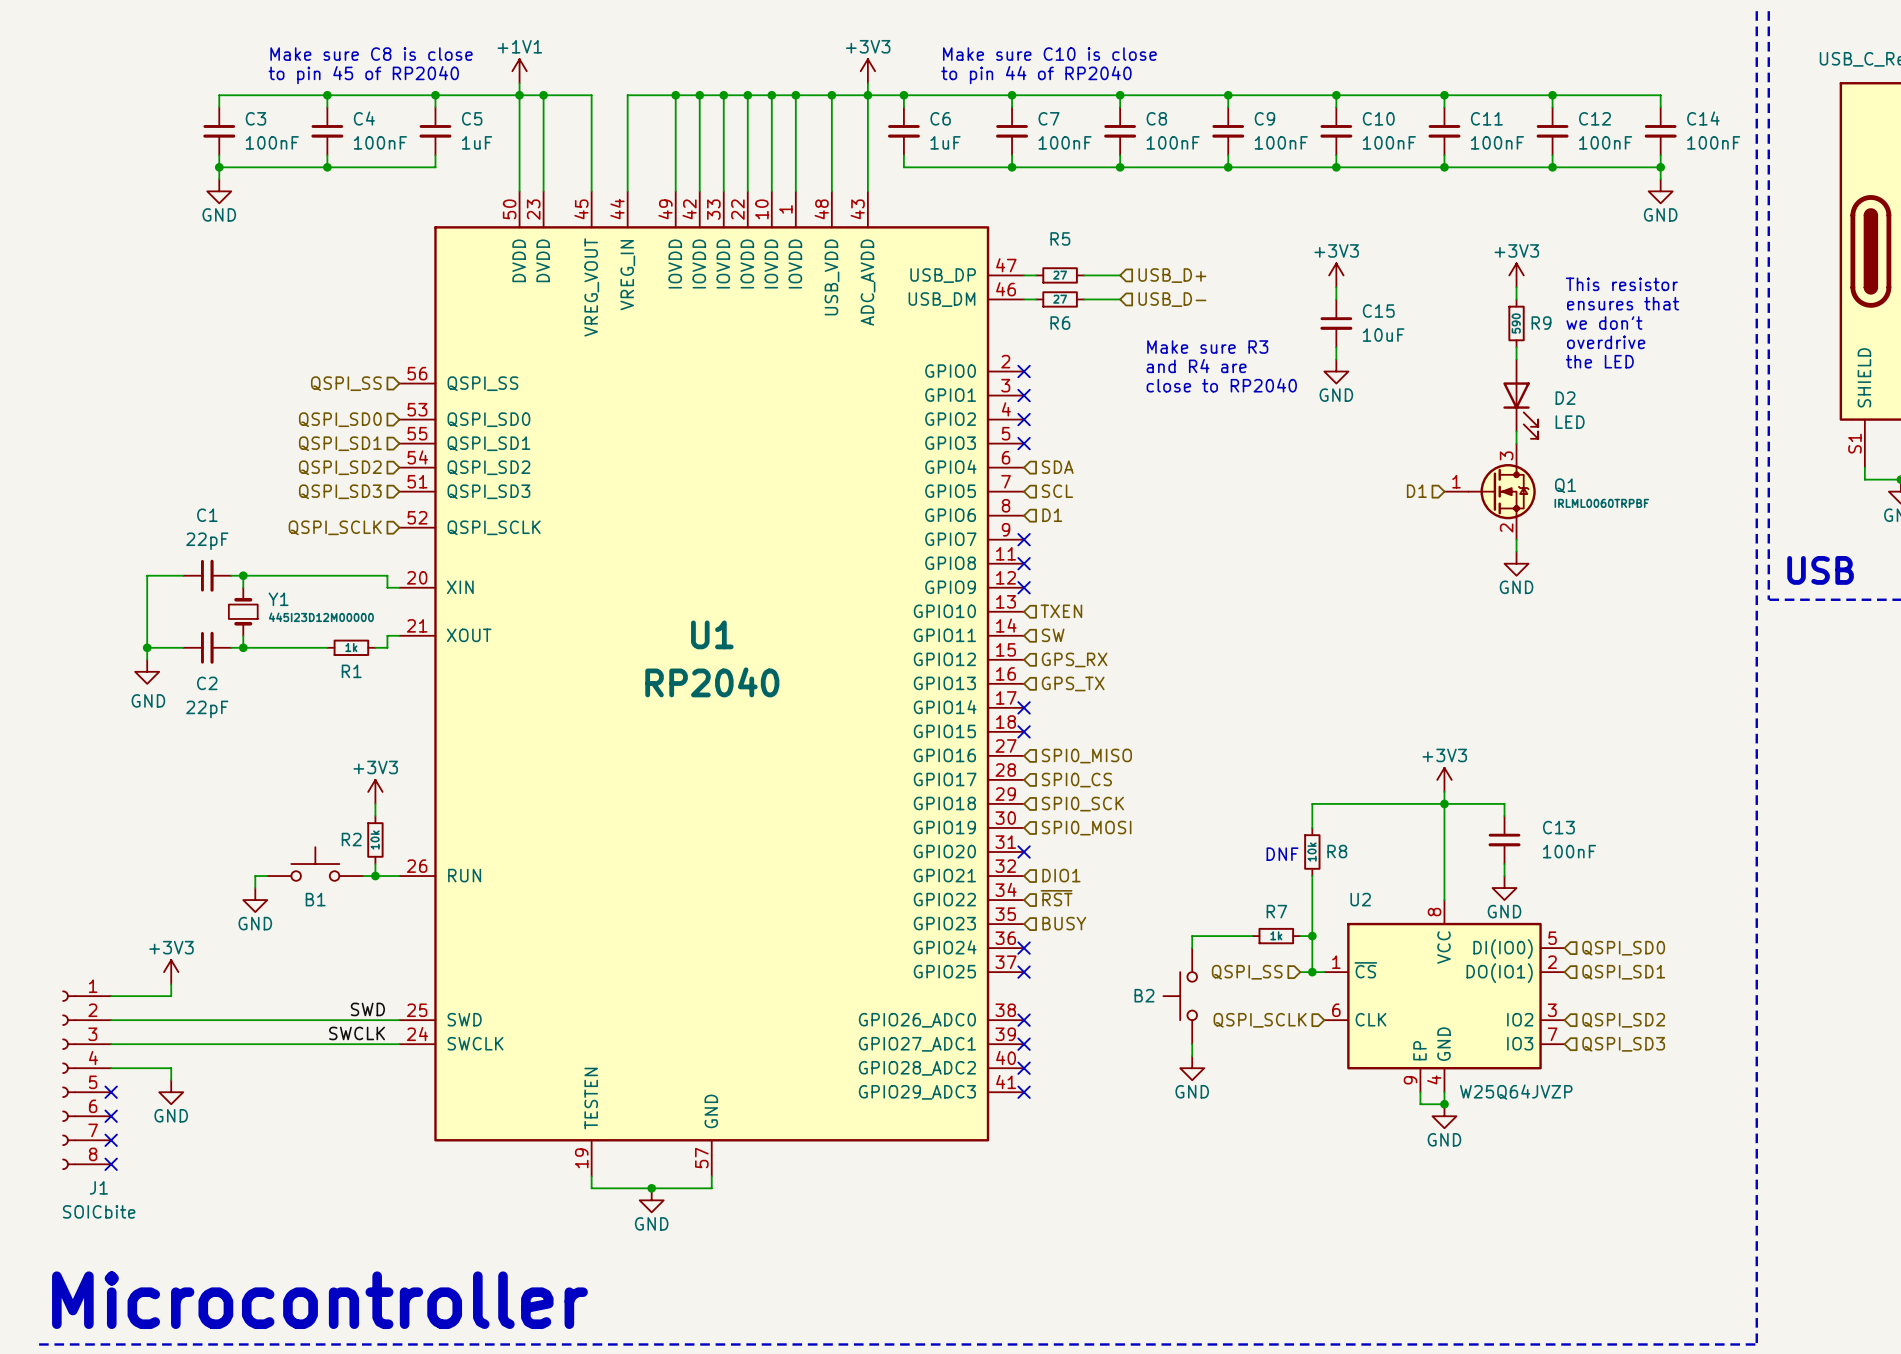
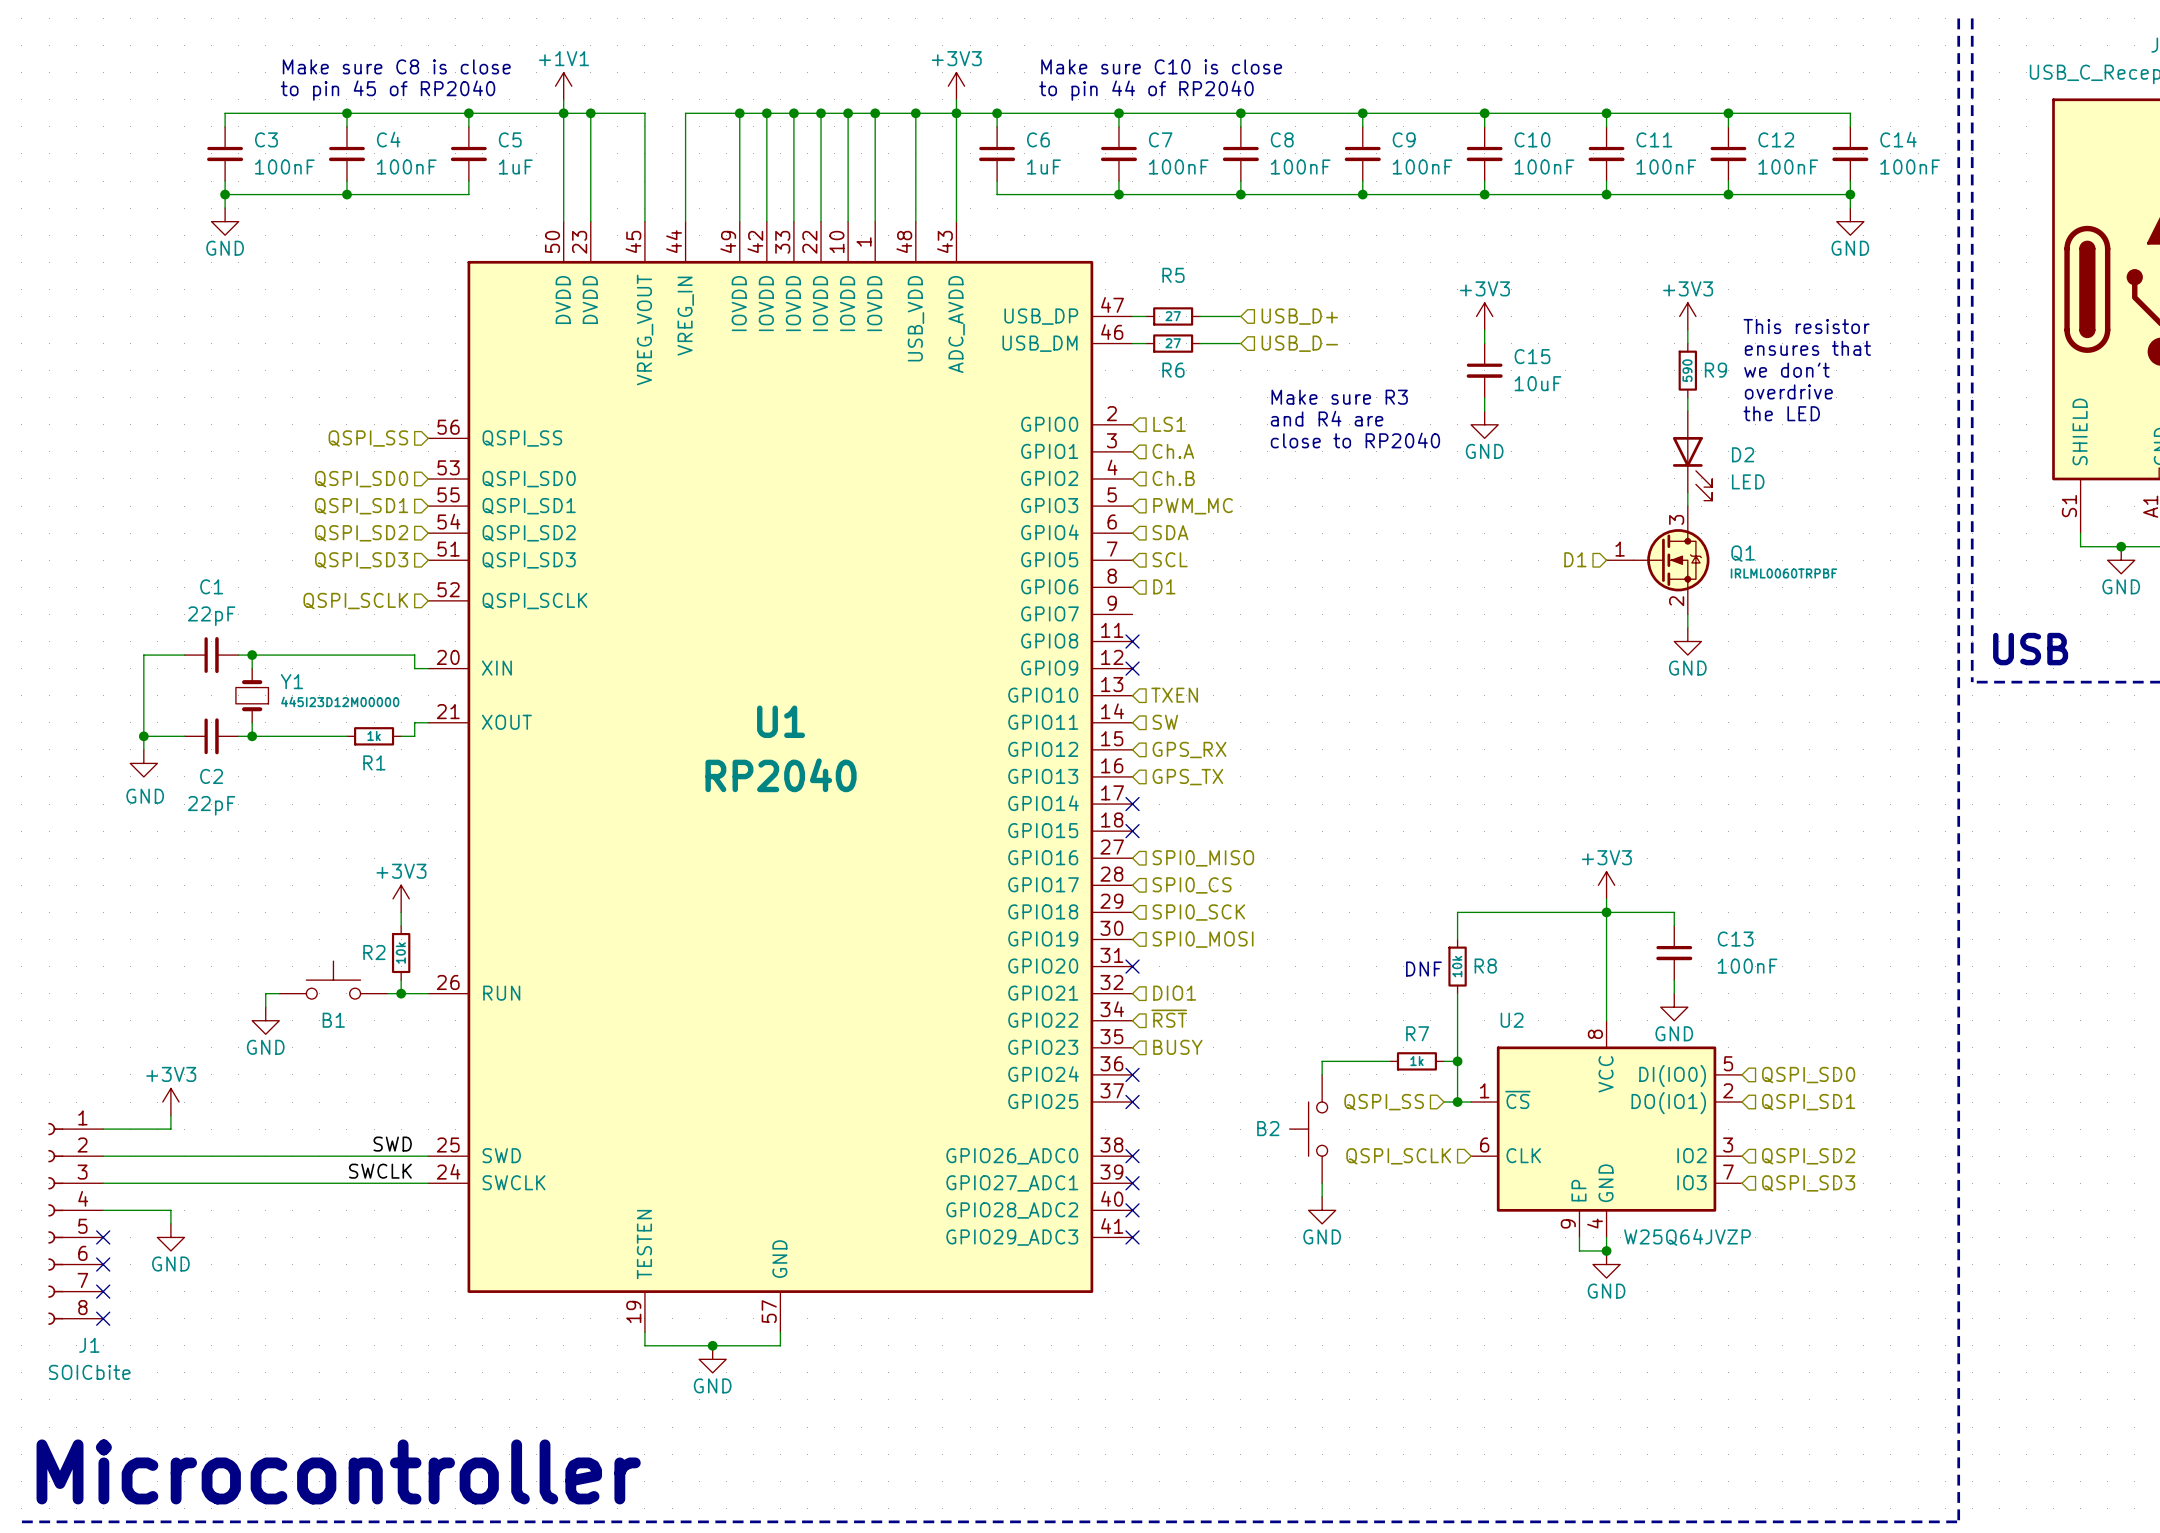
no-connect mark: (1024, 371) -> none
hierarchical label: none -> LS1 (1169, 424)
no-connect mark: (1024, 395) -> none
hierarchical label: none -> Ch.A (1173, 451)
no-connect mark: (1024, 419) -> none
hierarchical label: none -> Ch.B (1173, 478)
no-connect mark: (1024, 443) -> none
hierarchical label: none -> PWM_MC (1193, 506)
no-connect mark: (1024, 539) -> none

